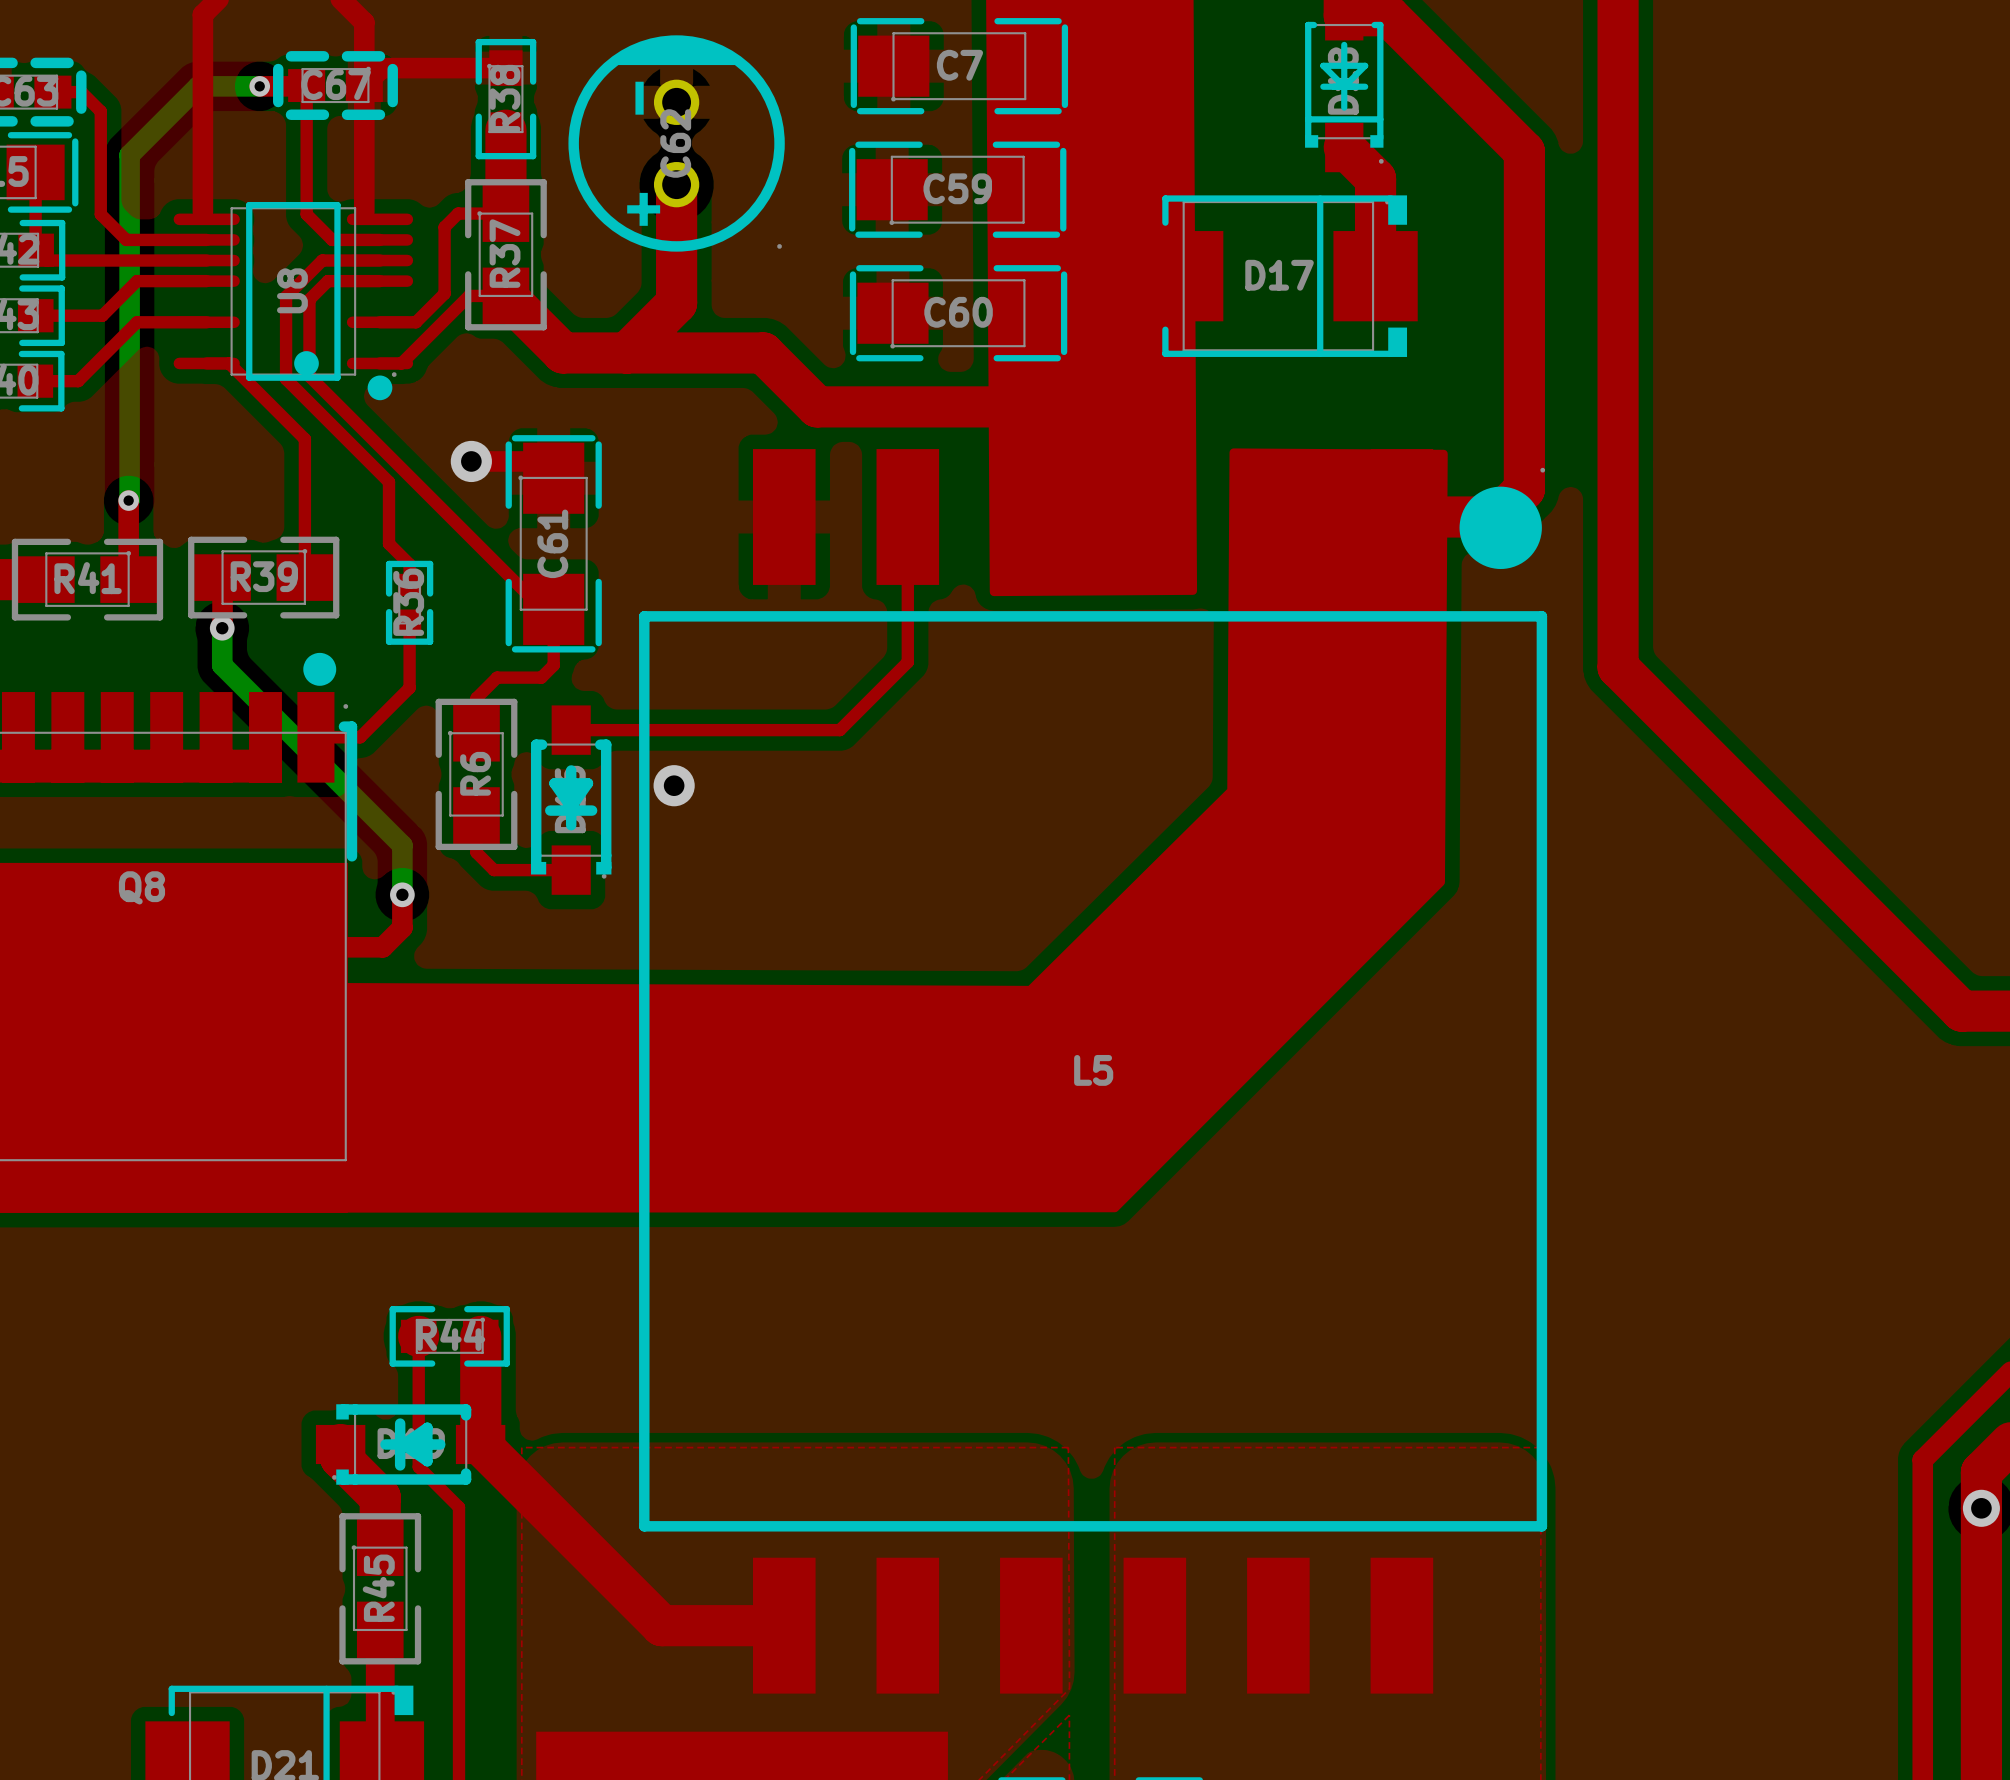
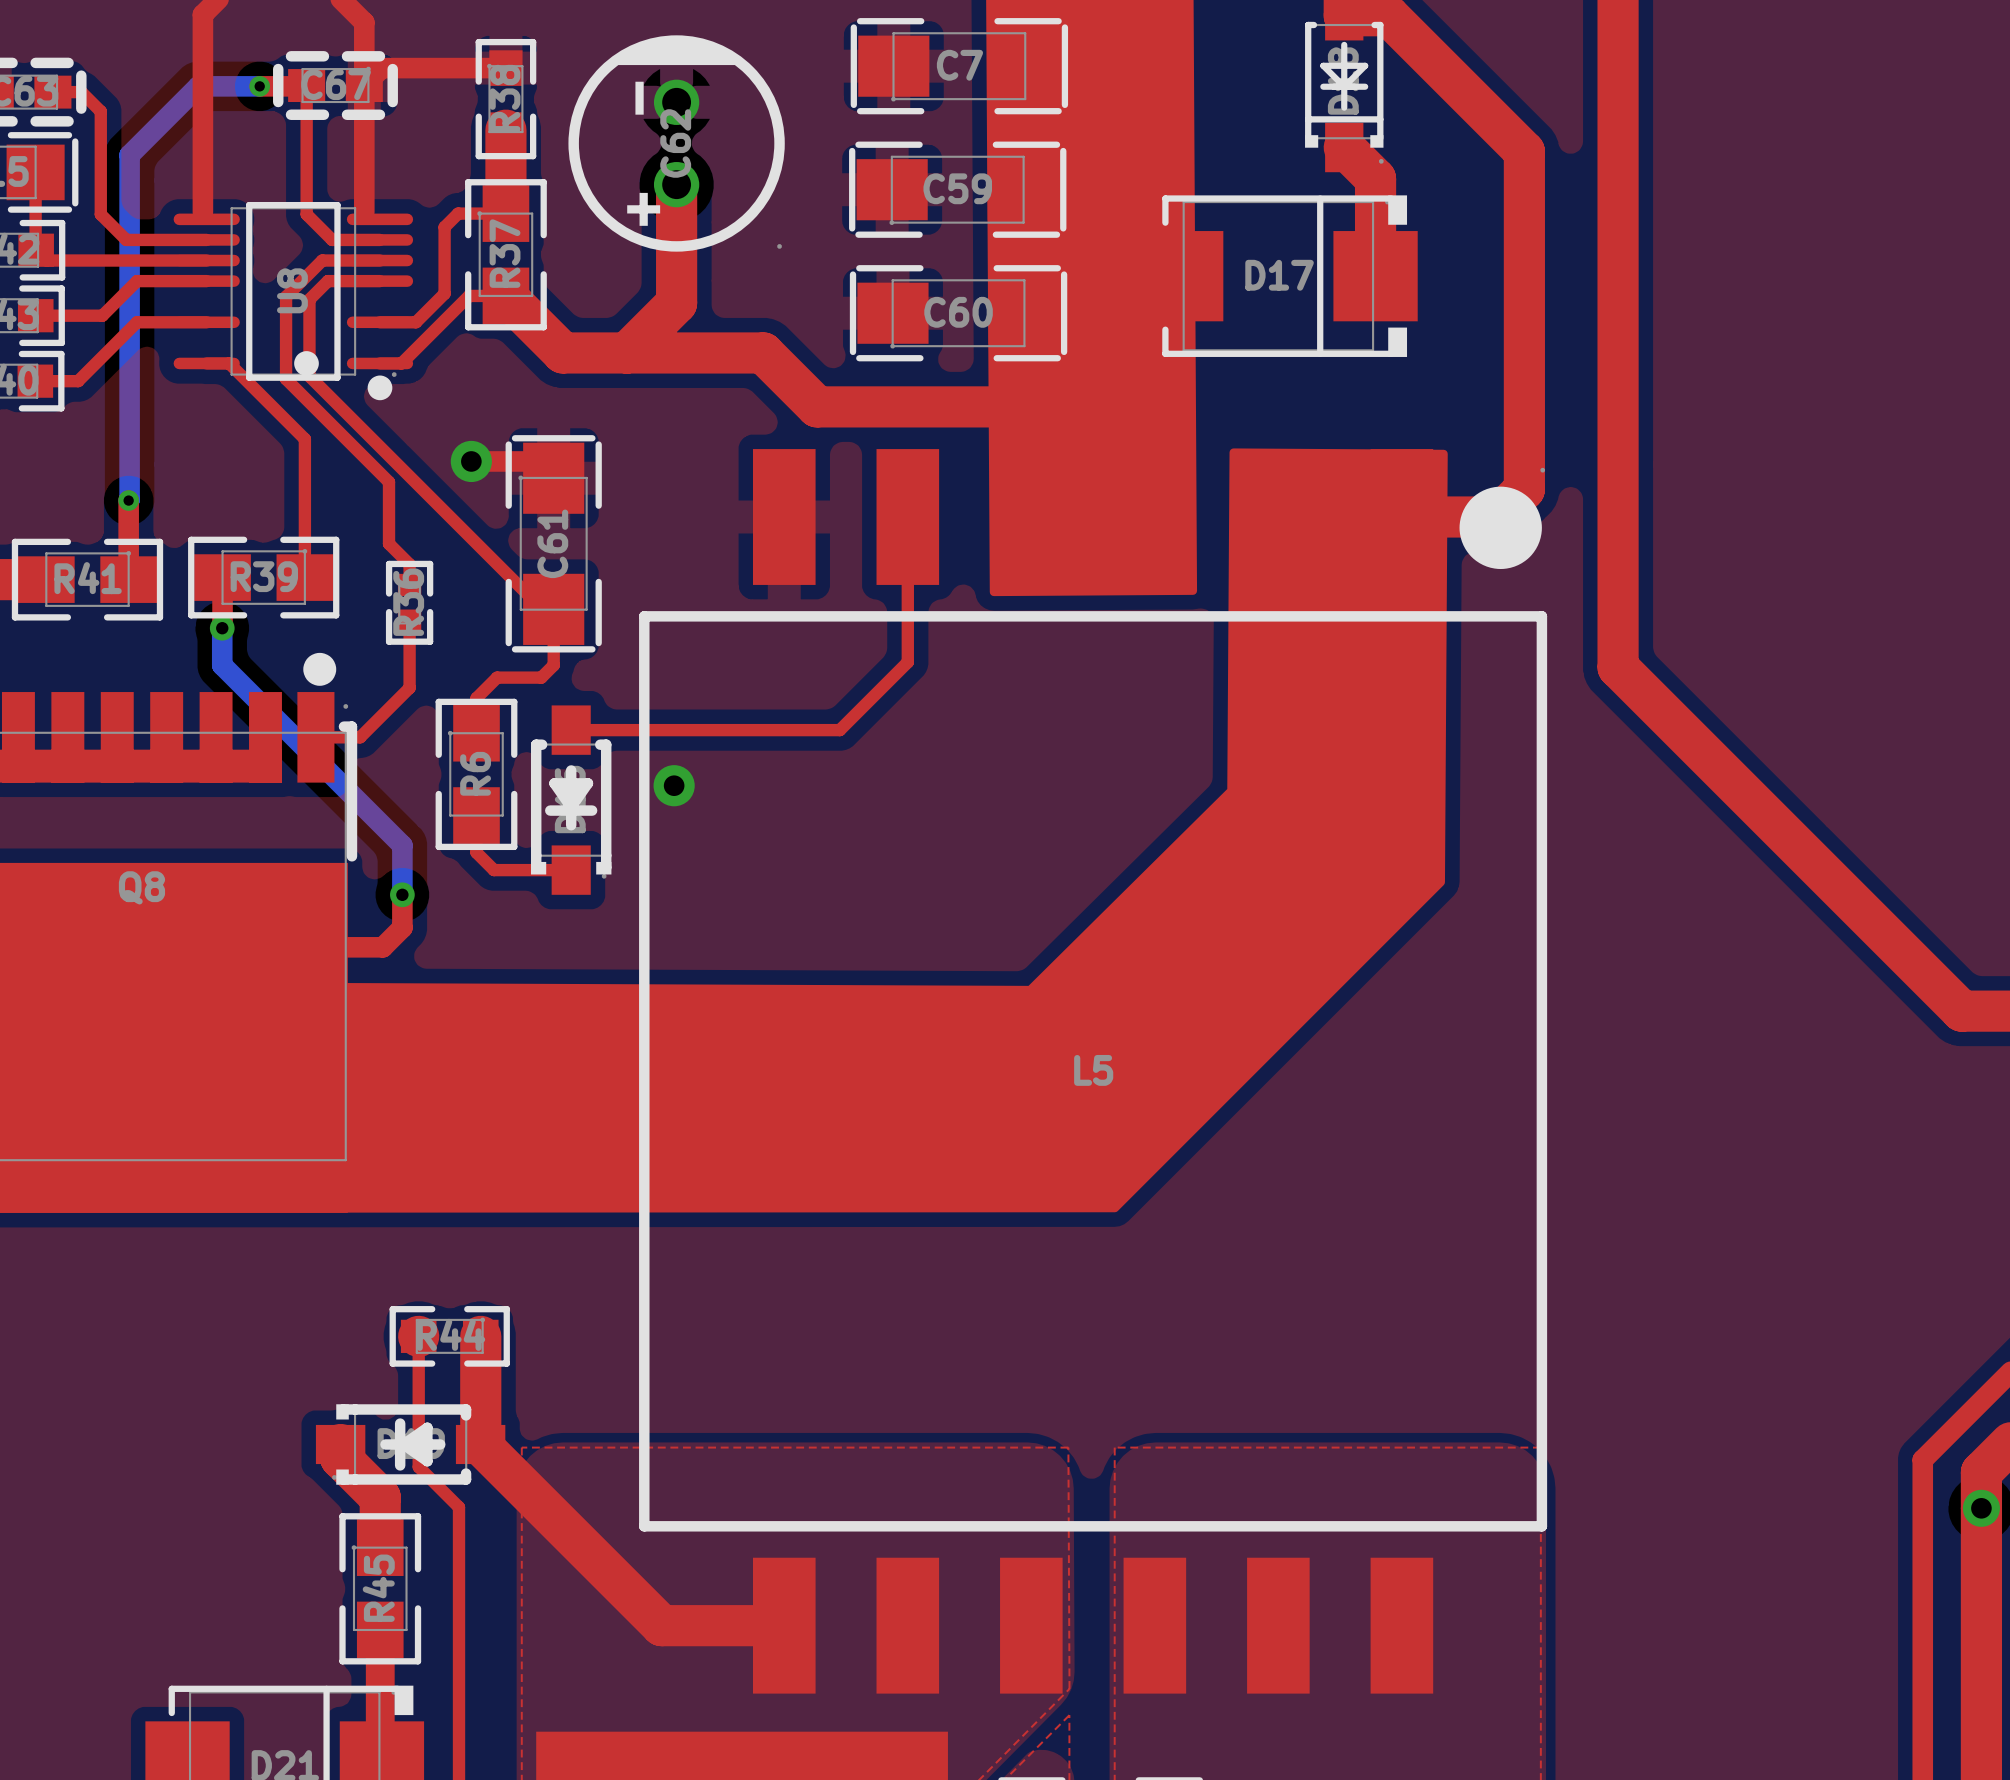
R37 footprint: [465, 179, 547, 331] -> [465, 179, 547, 331]
R39 footprint: [188, 536, 340, 619] -> [188, 536, 340, 619]
R41 footprint: [11, 538, 164, 621] -> [11, 538, 164, 621]
R6 footprint: [435, 698, 518, 851] -> [435, 698, 518, 851]
R45 footprint: [339, 1513, 422, 1665] -> [339, 1513, 422, 1665]

